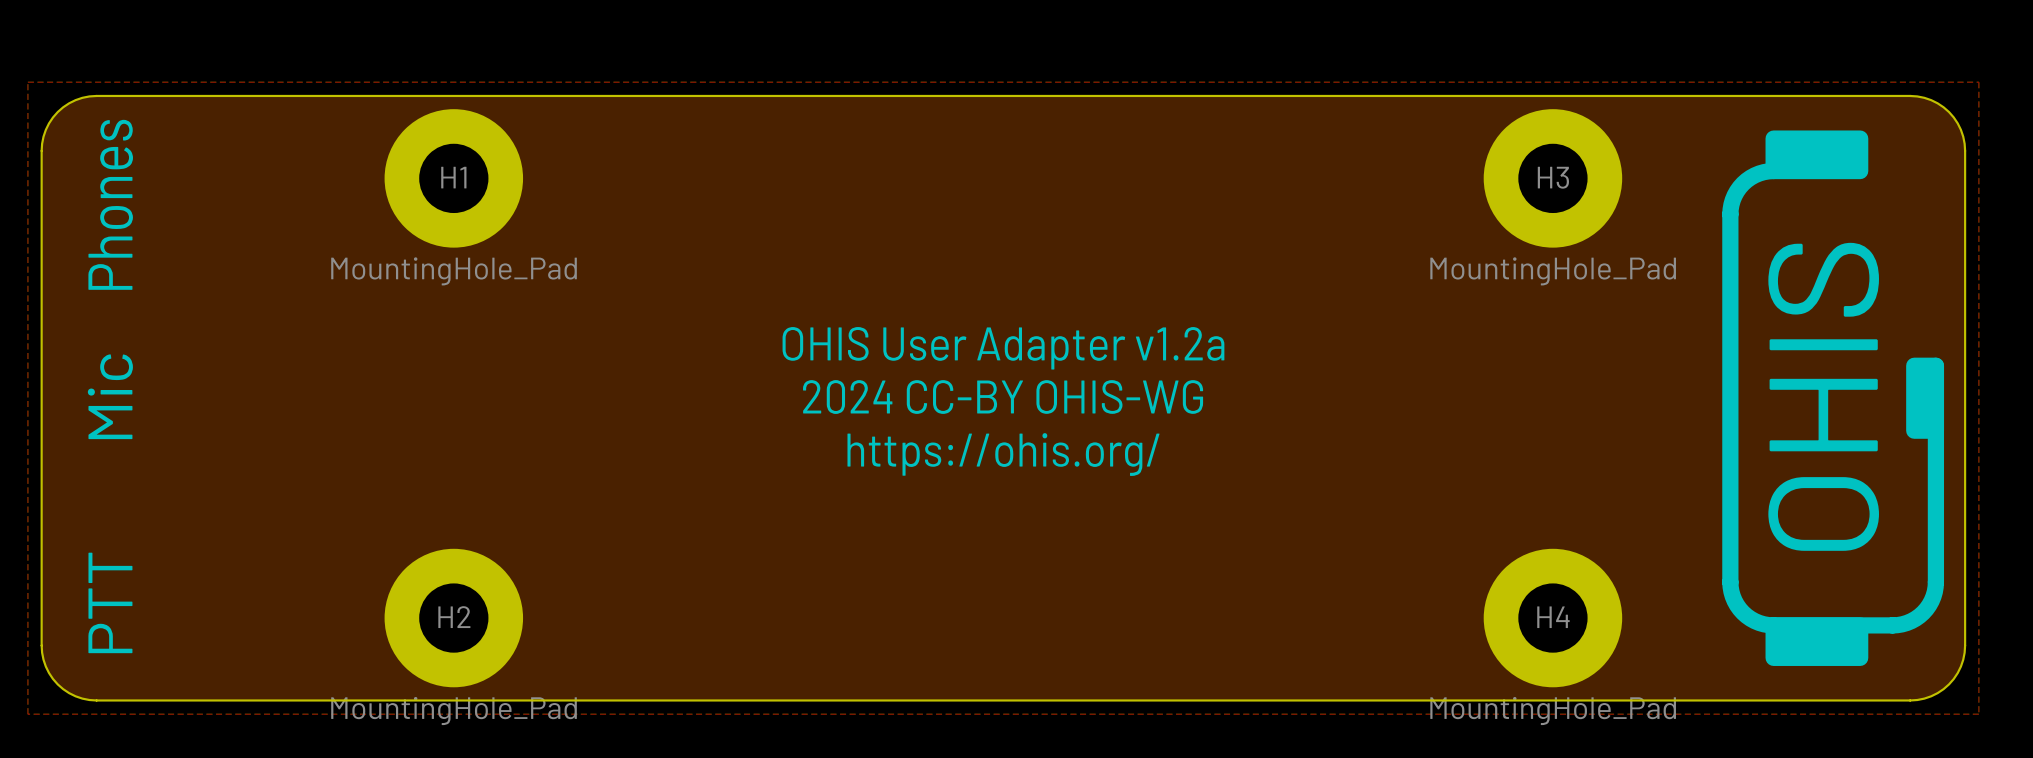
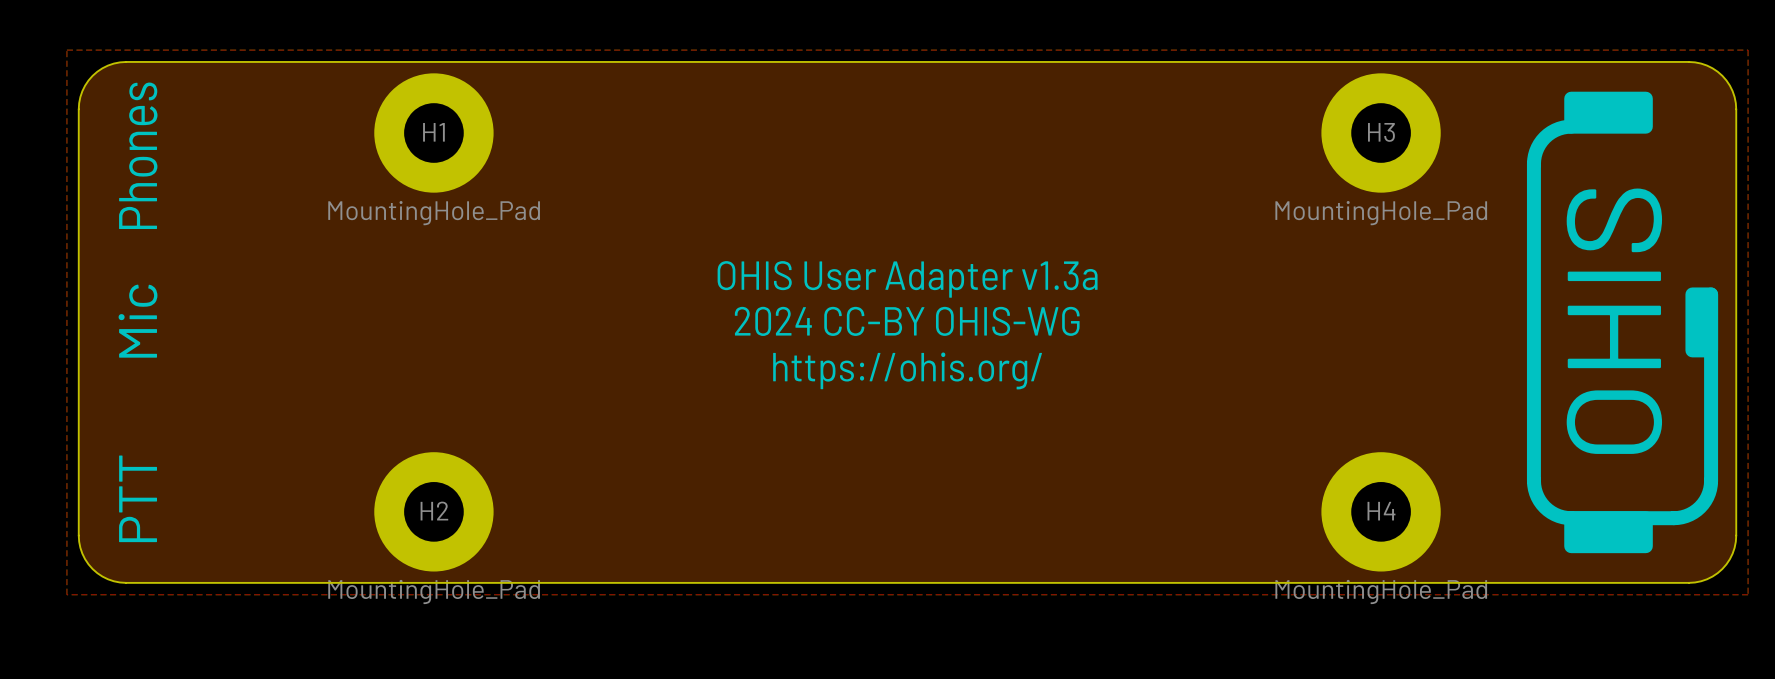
text: OHIS User Adapter v1.2a (1003, 348) -> OHIS User Adapter v1.3a (907, 279)

